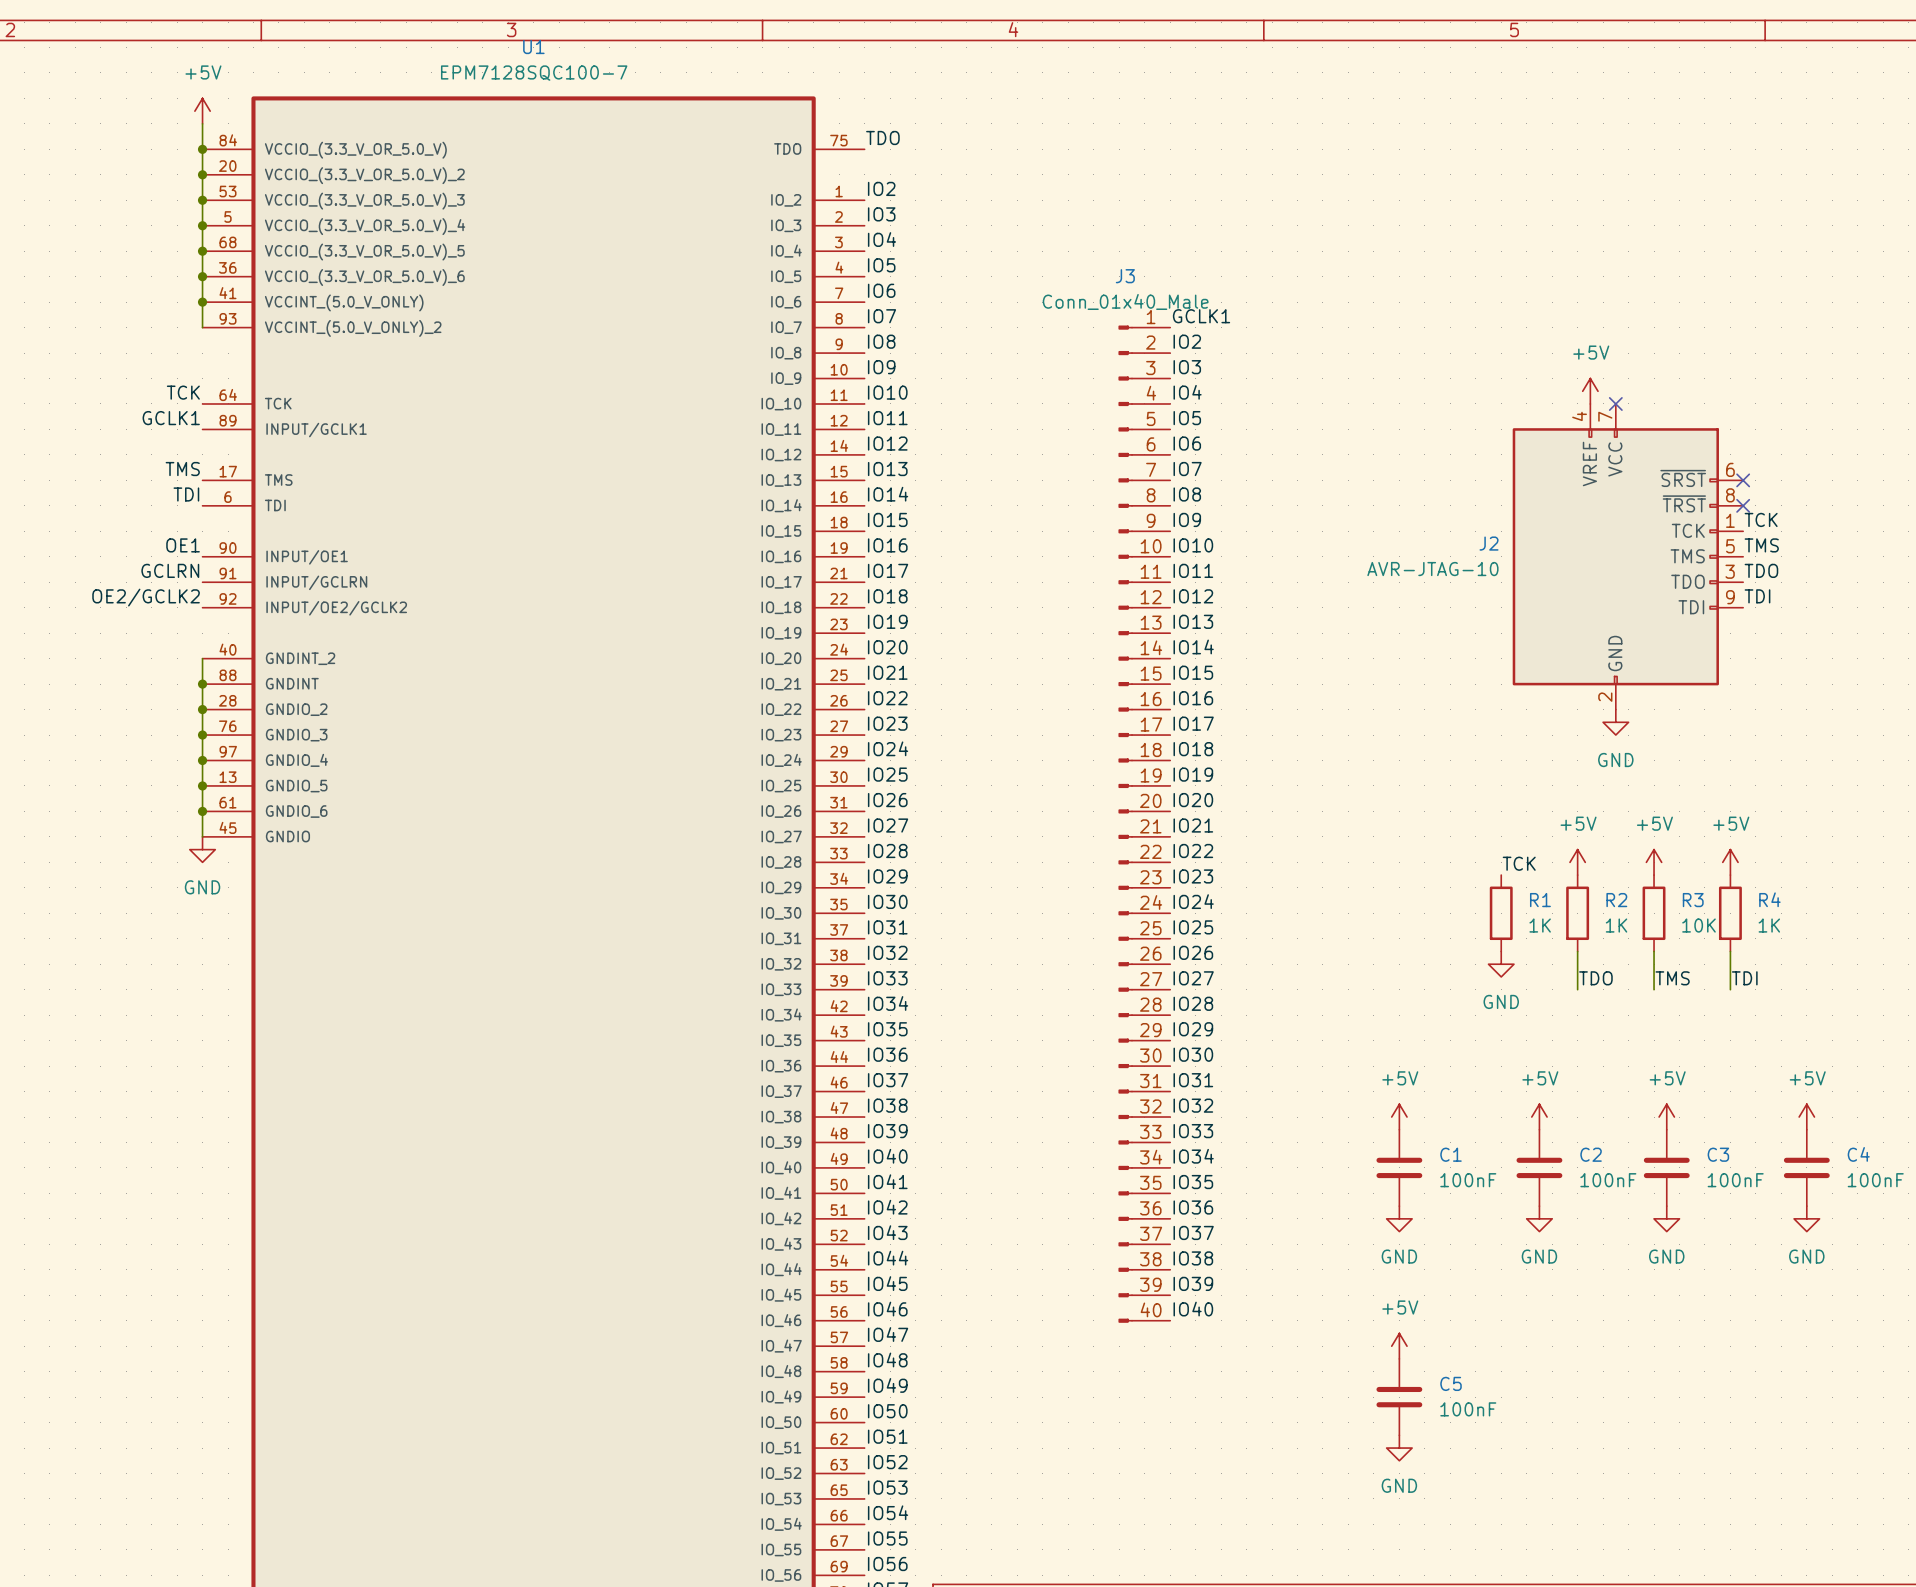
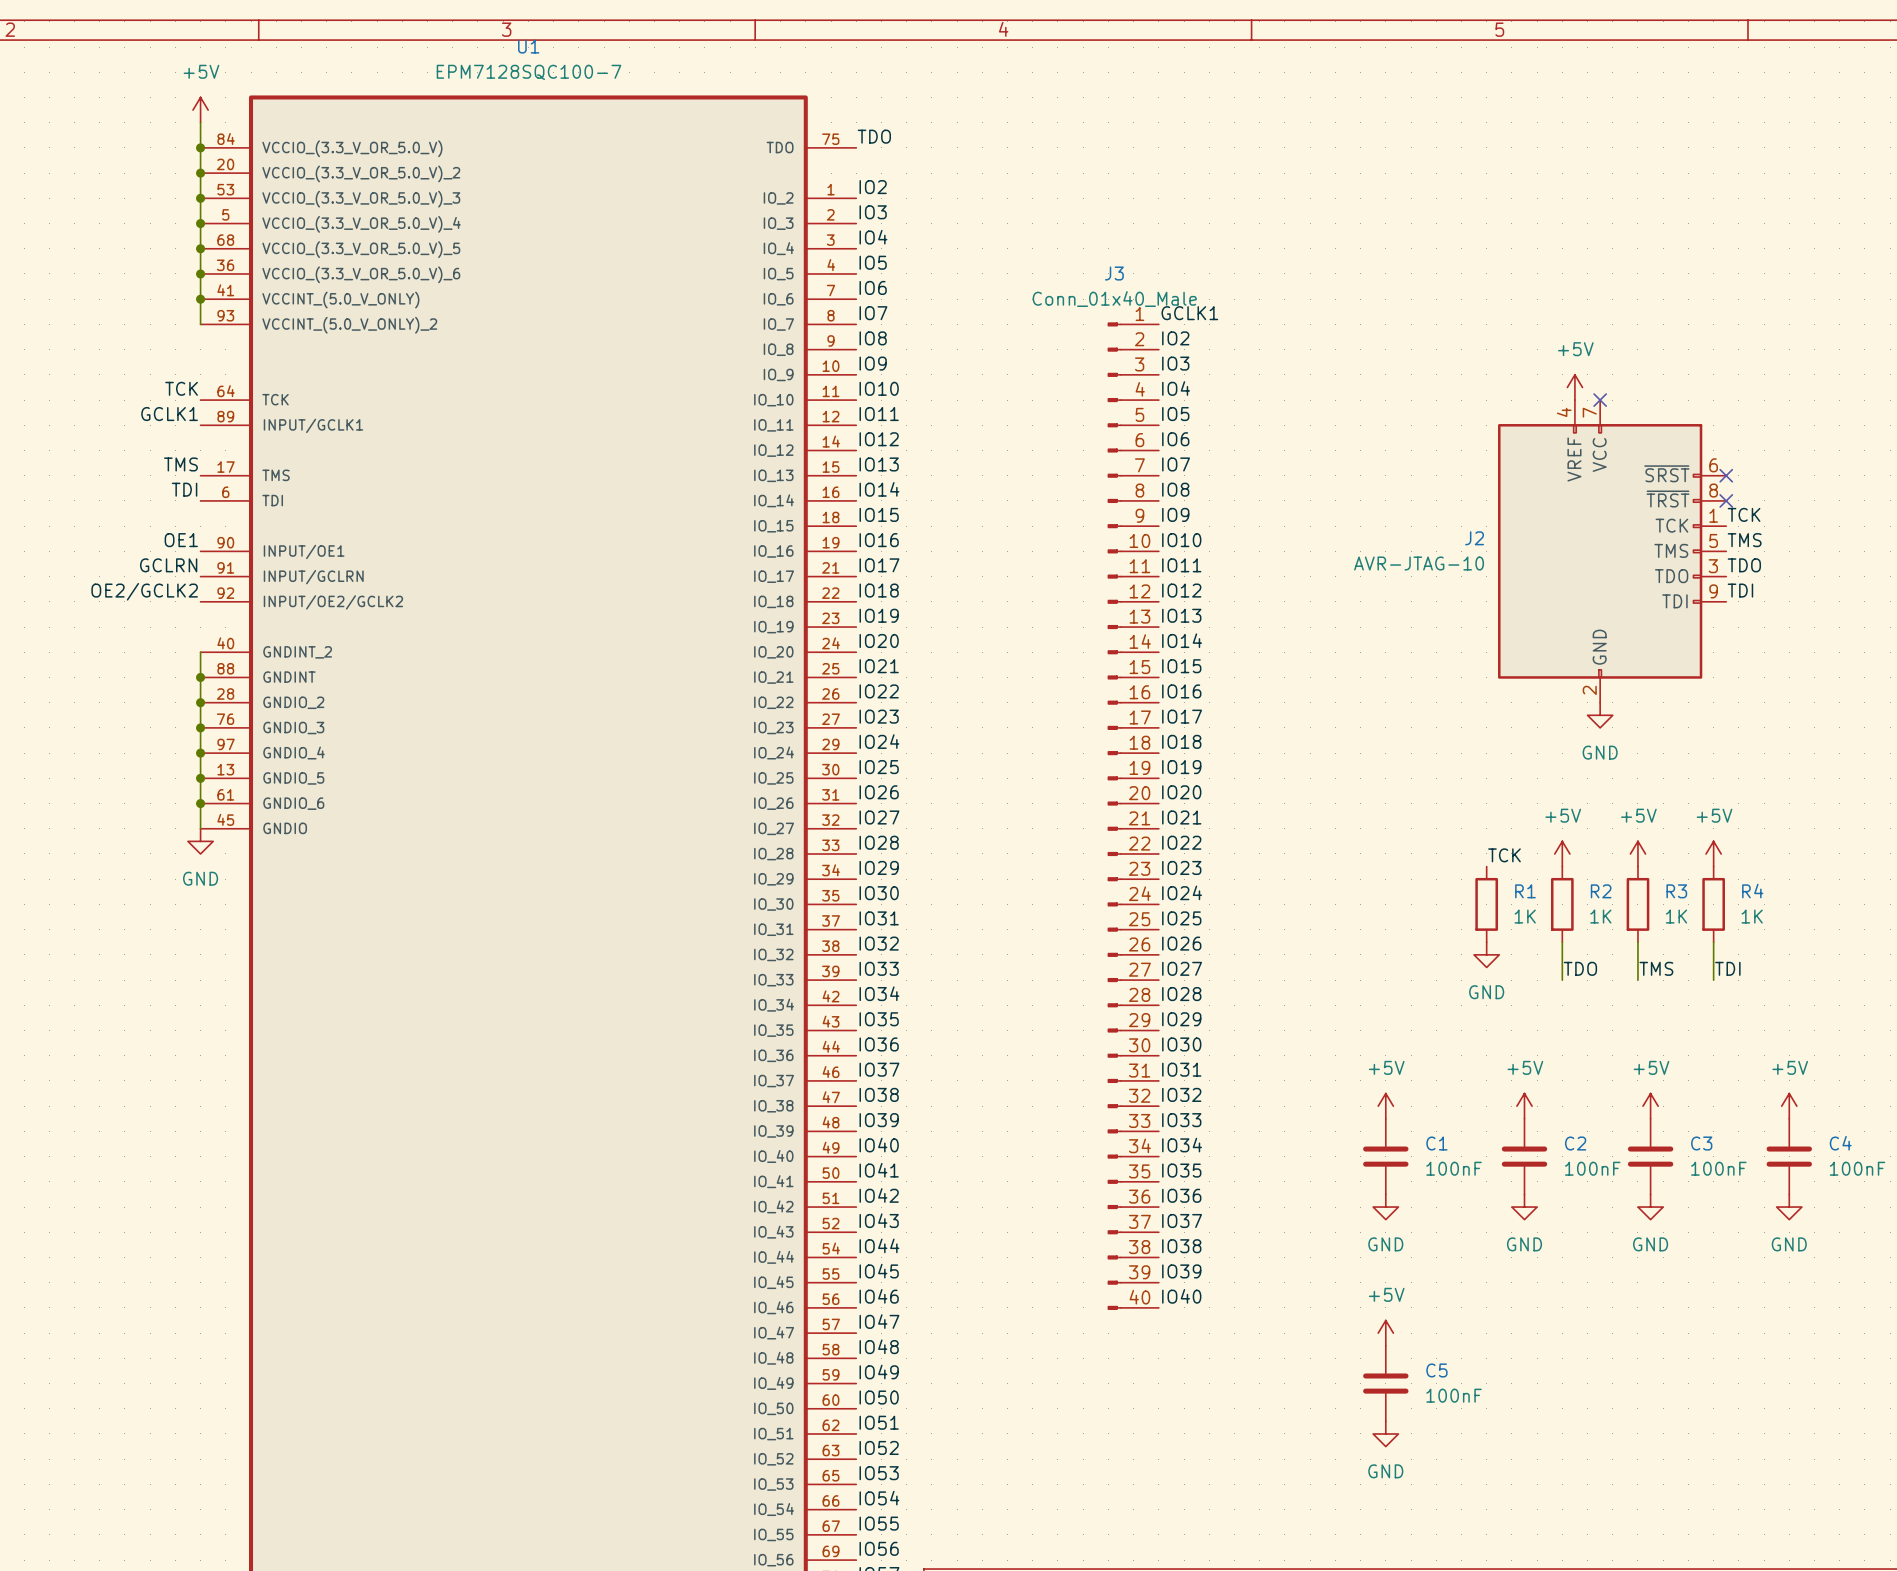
R3 value: 10K (1698, 925) -> 1K (1676, 916)

